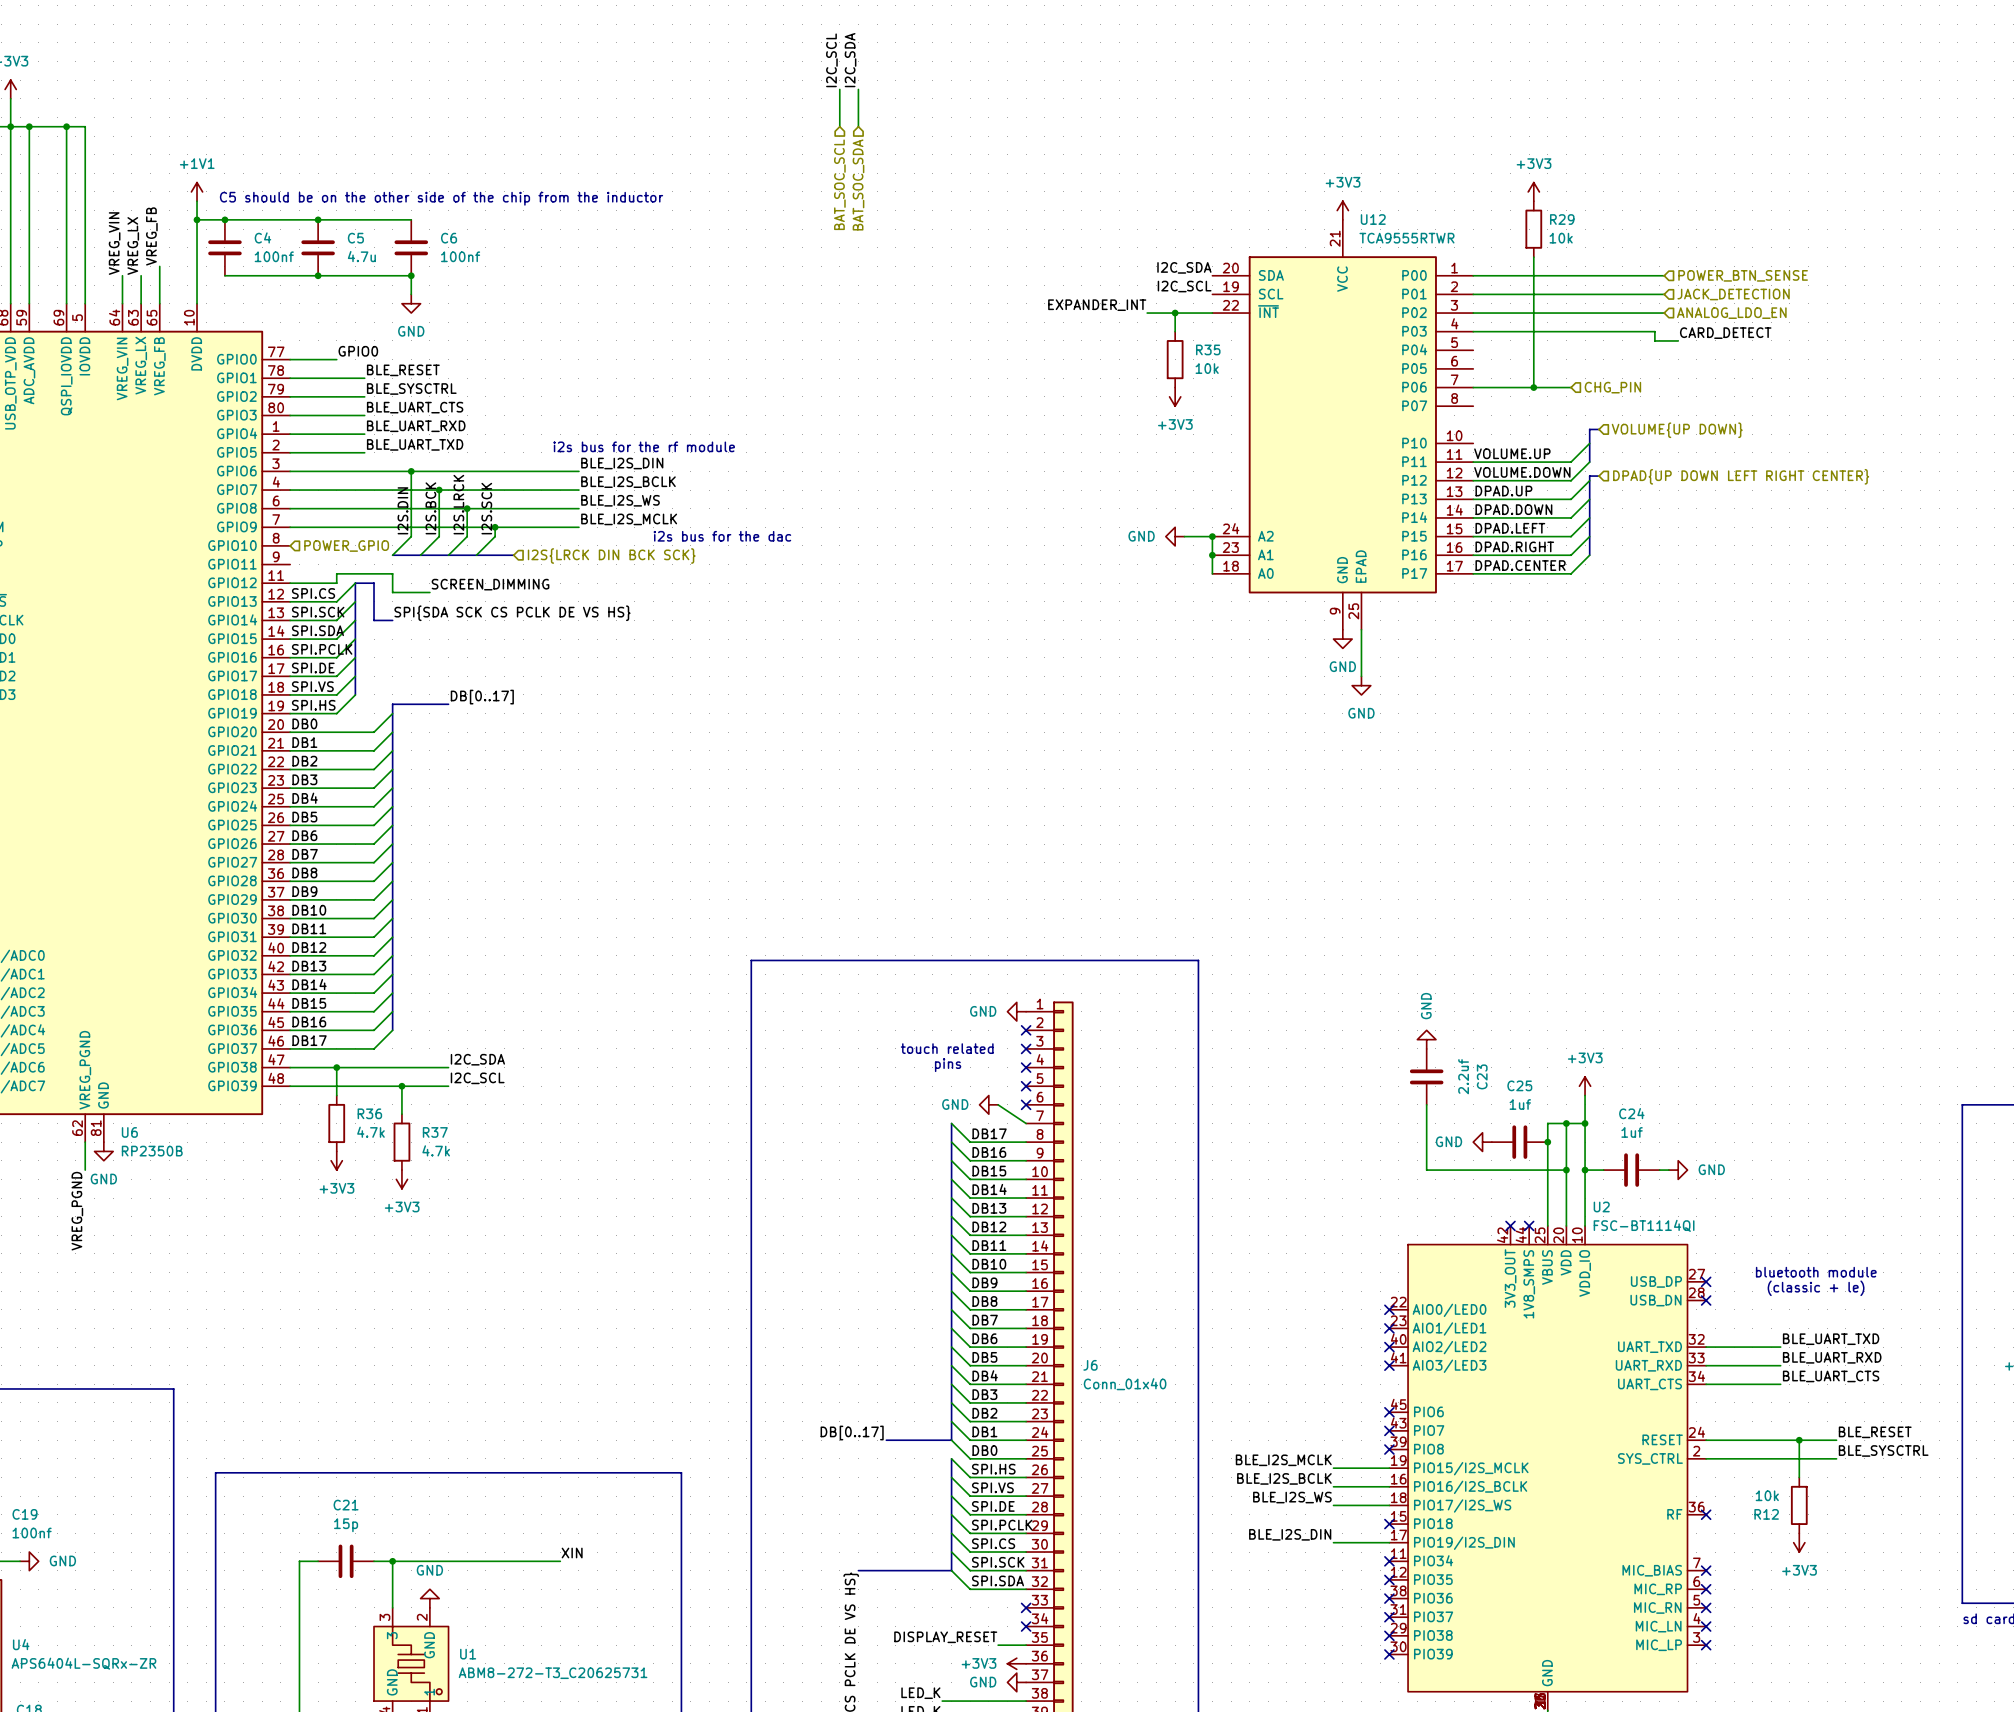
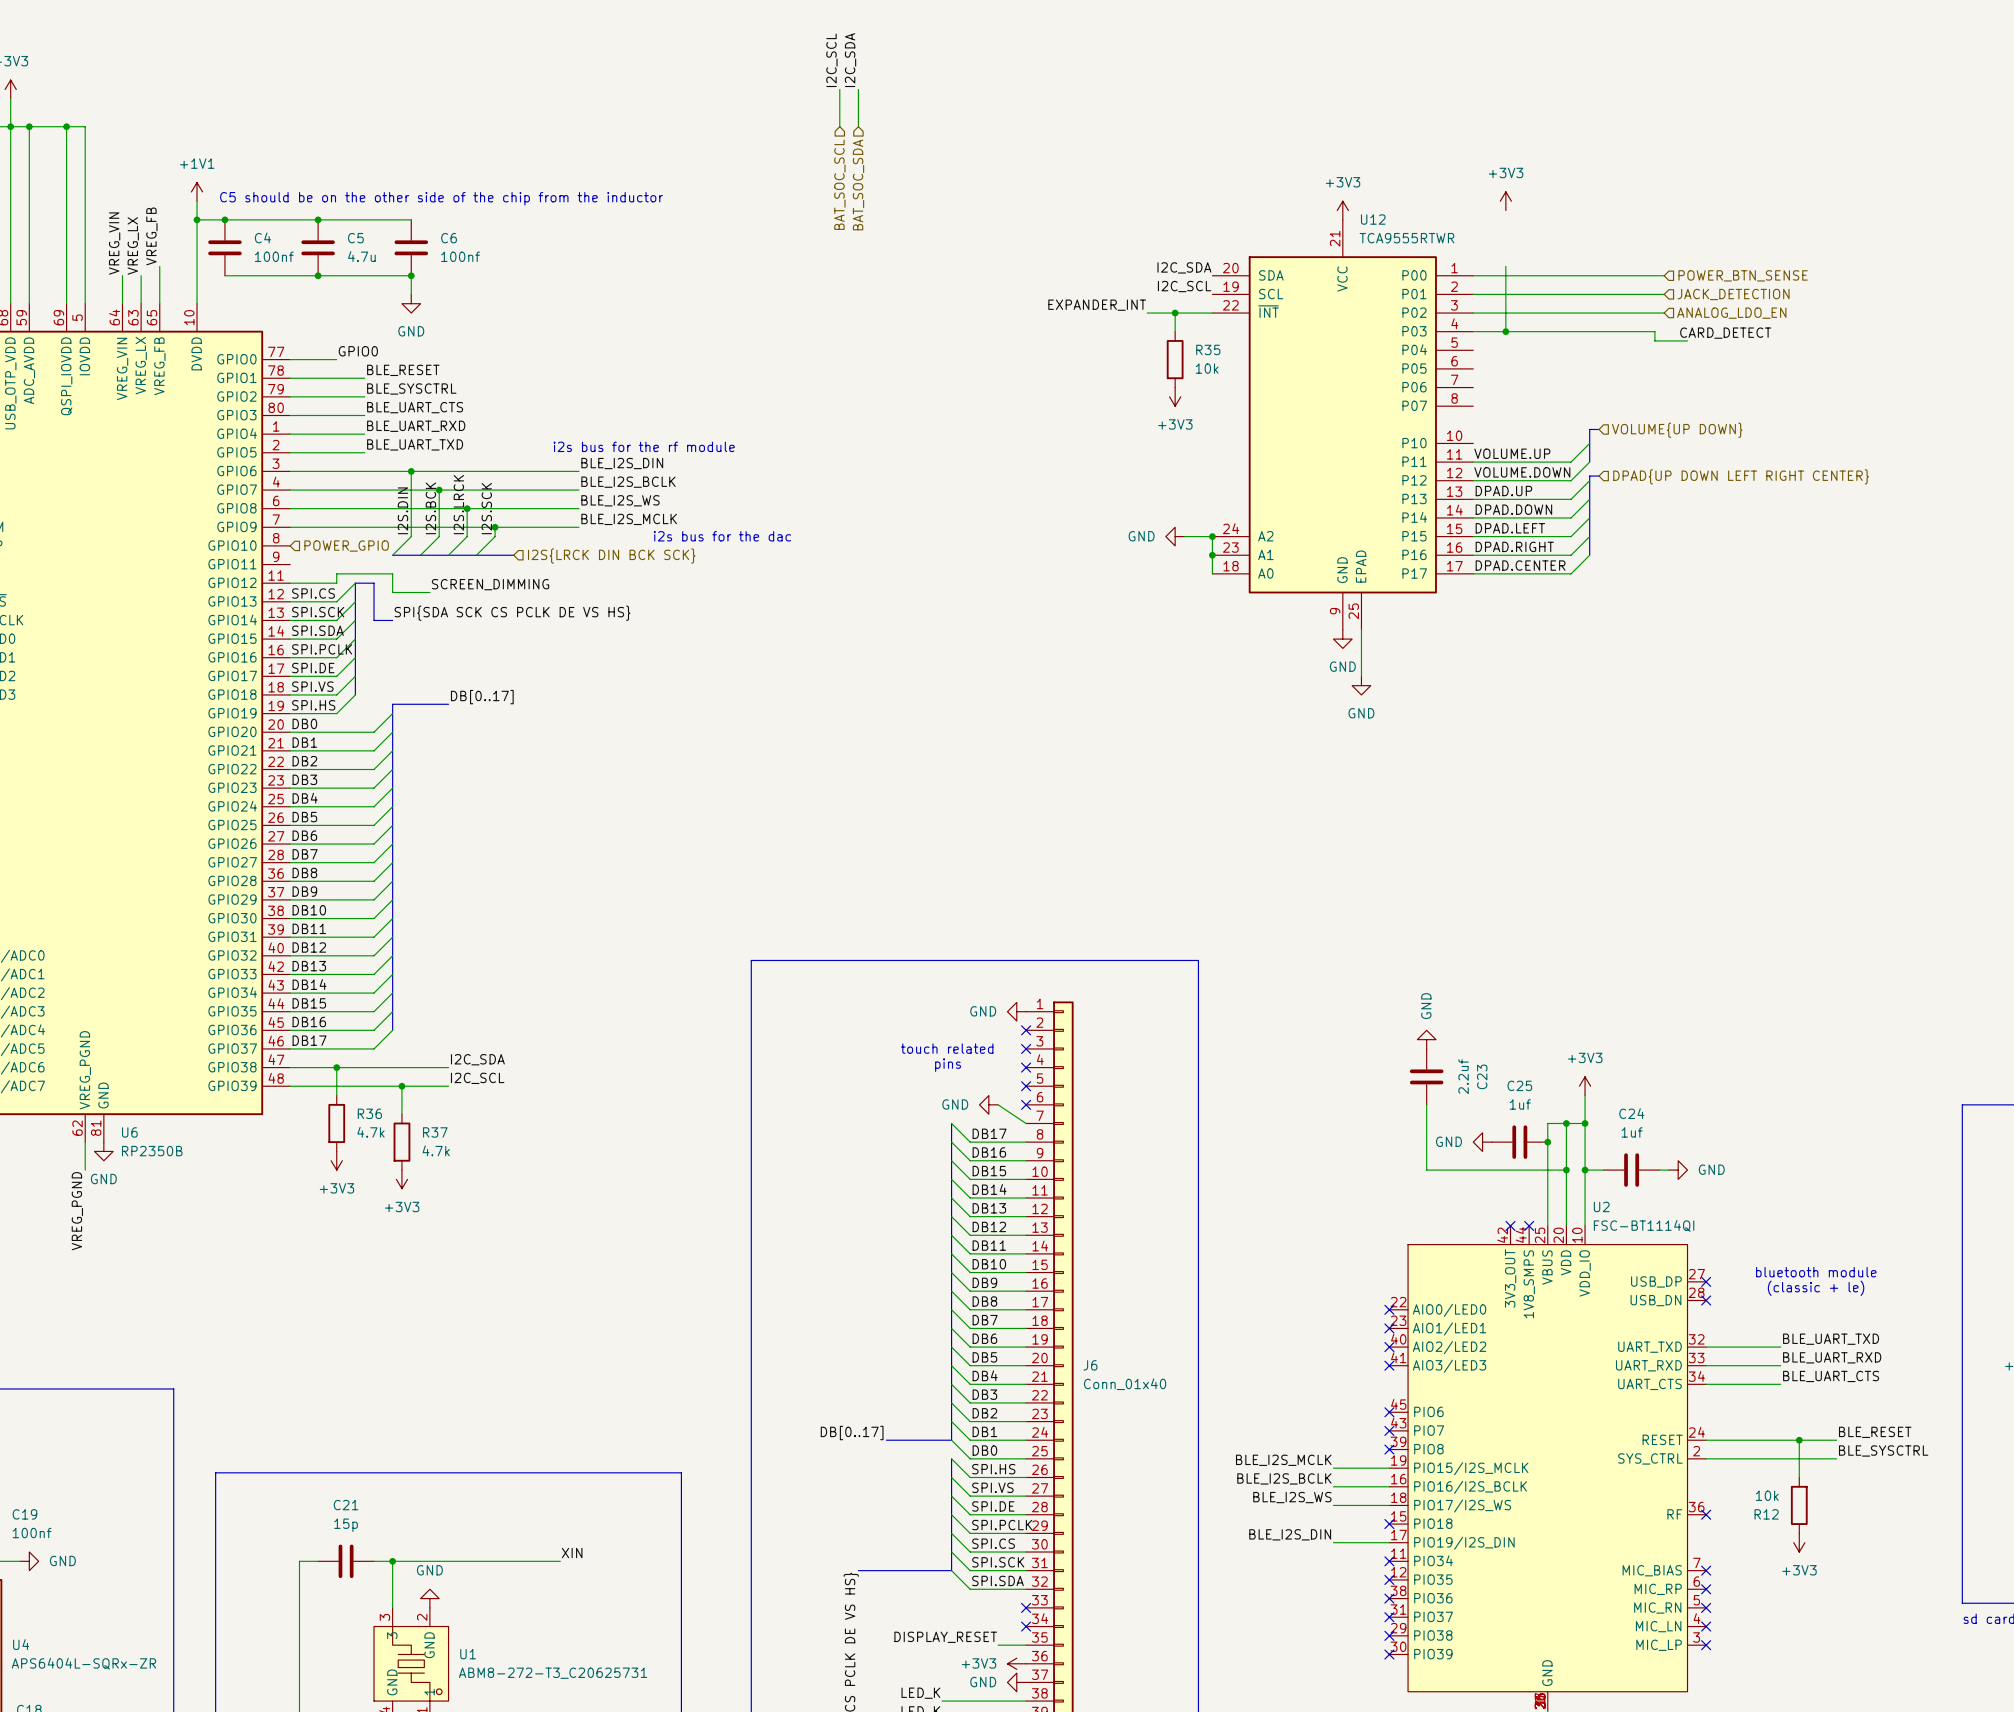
power symbol position: +3V3 (1533, 191) -> +3V3 (1505, 201)
R29: 10k (1533, 229) -> none
wire: (1533, 257) (1533, 387) -> none
wire: none -> (1505, 266) (1505, 331)
junction: none -> (1505, 331)
wire: none -> (1678, 340) (1687, 340)
wire: (1473, 387) (1571, 387) -> none
junction: (1533, 387) -> none
hierarchical label: CHG_PIN (1612, 387) -> none

